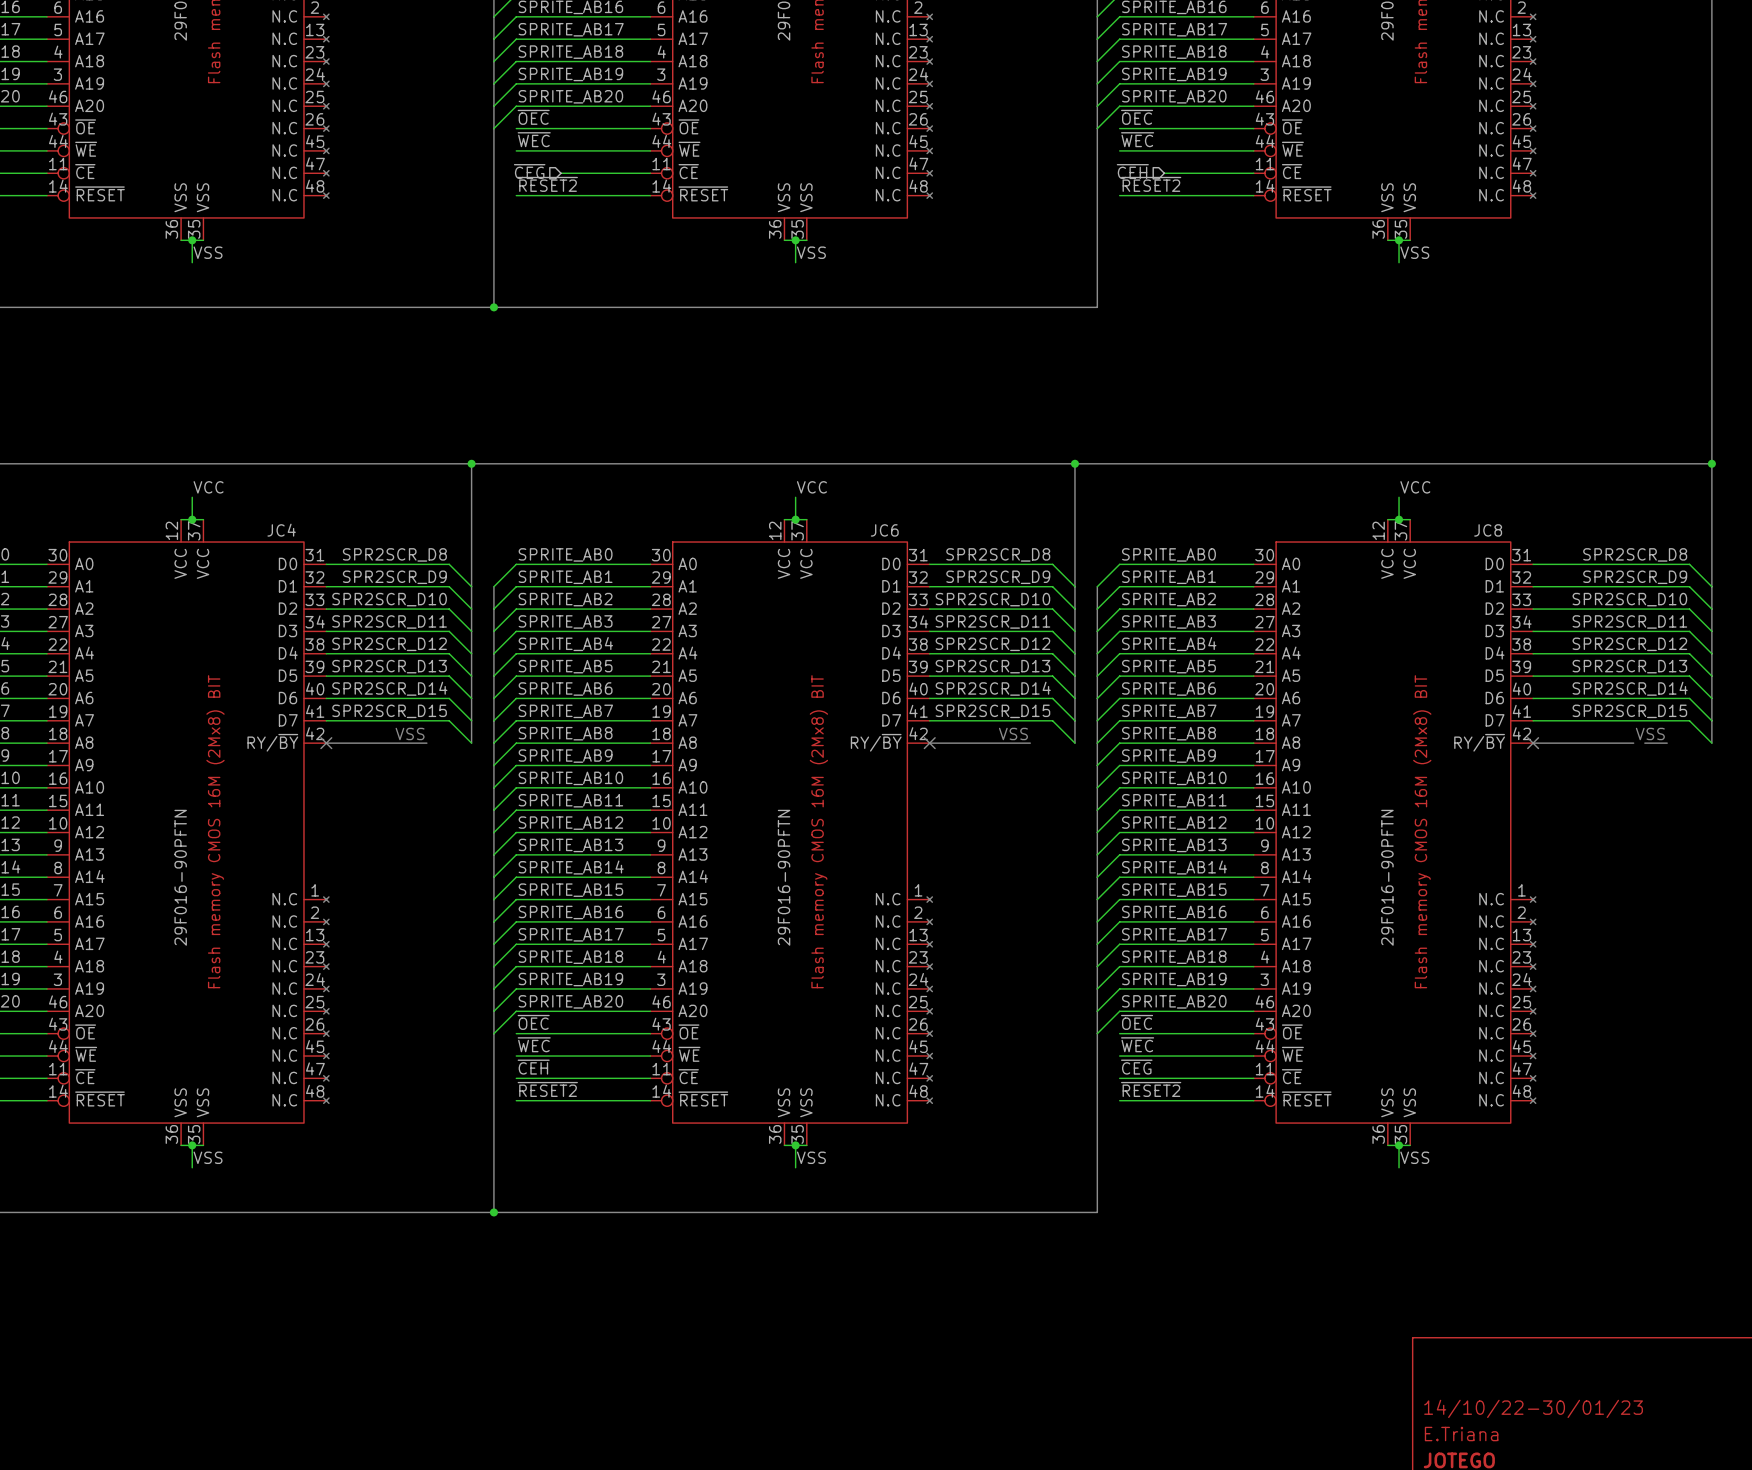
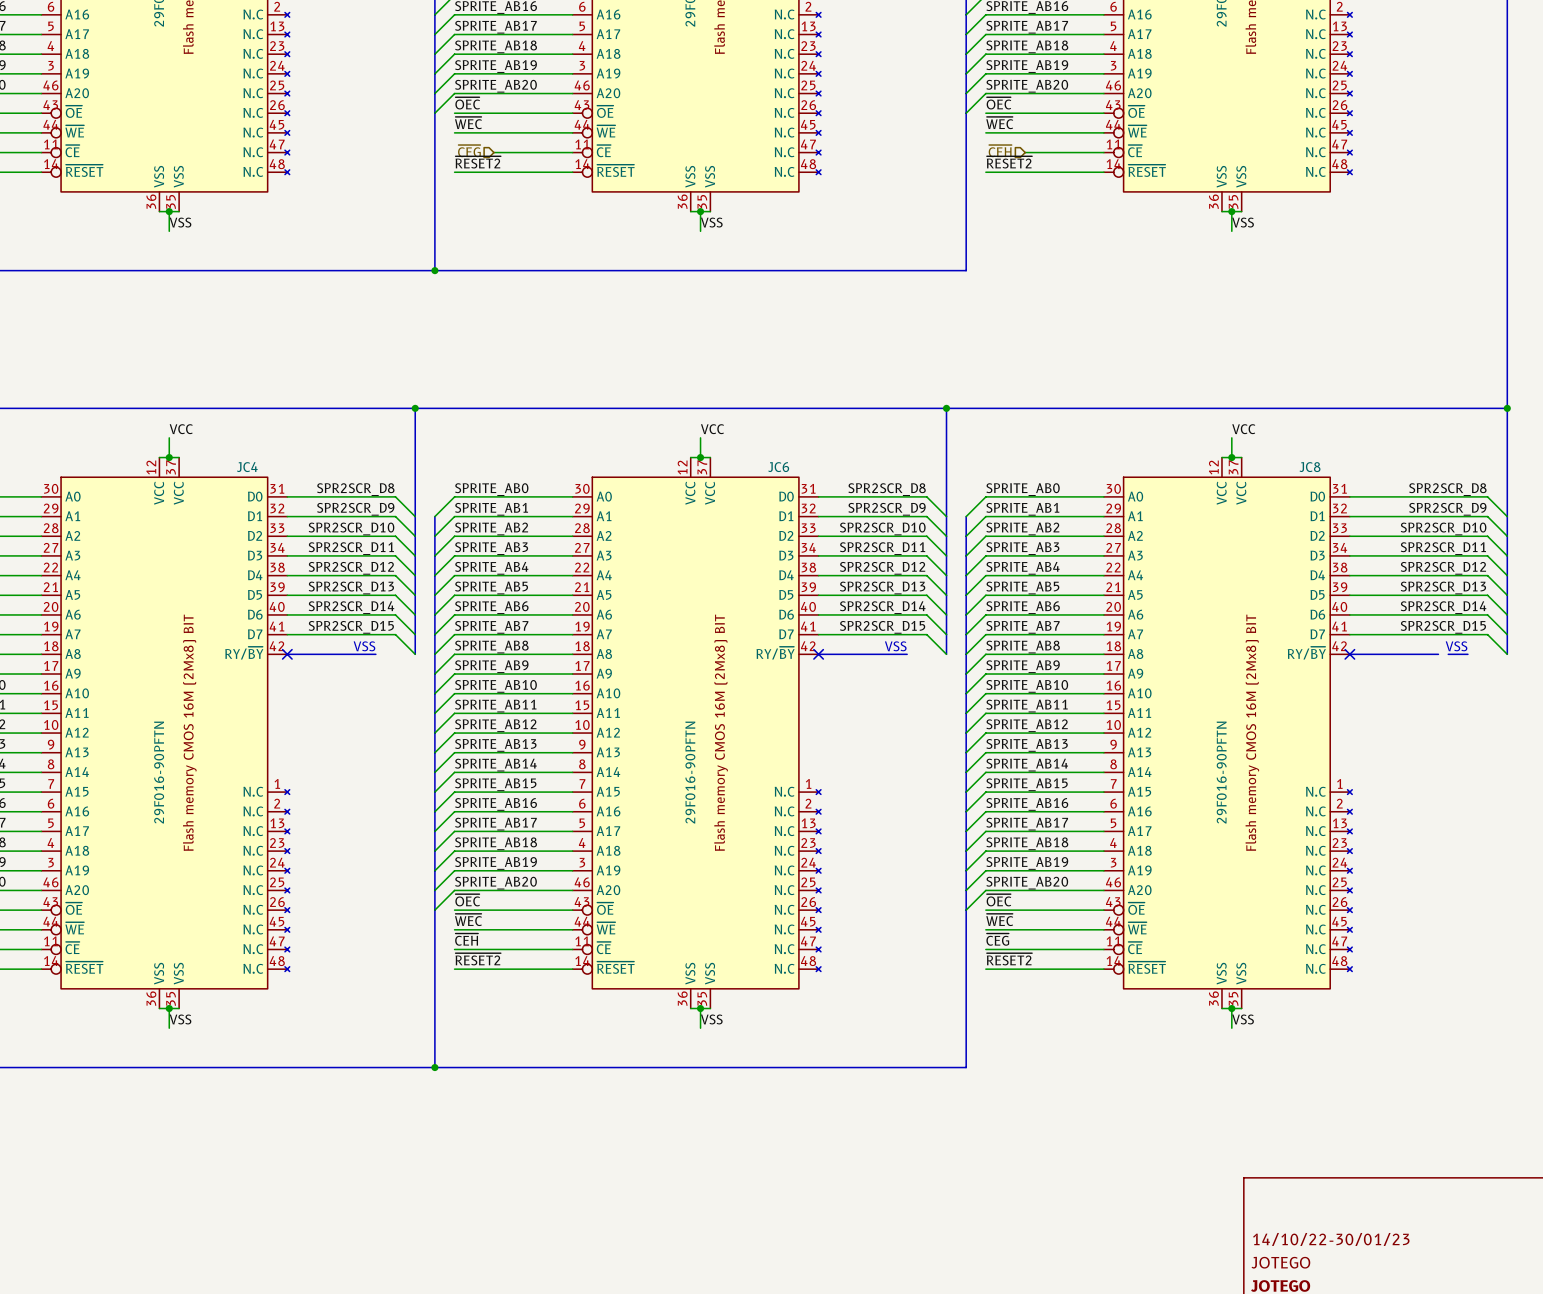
title block: E.Triana (1461, 1434) -> JOTEGO (1280, 1262)

